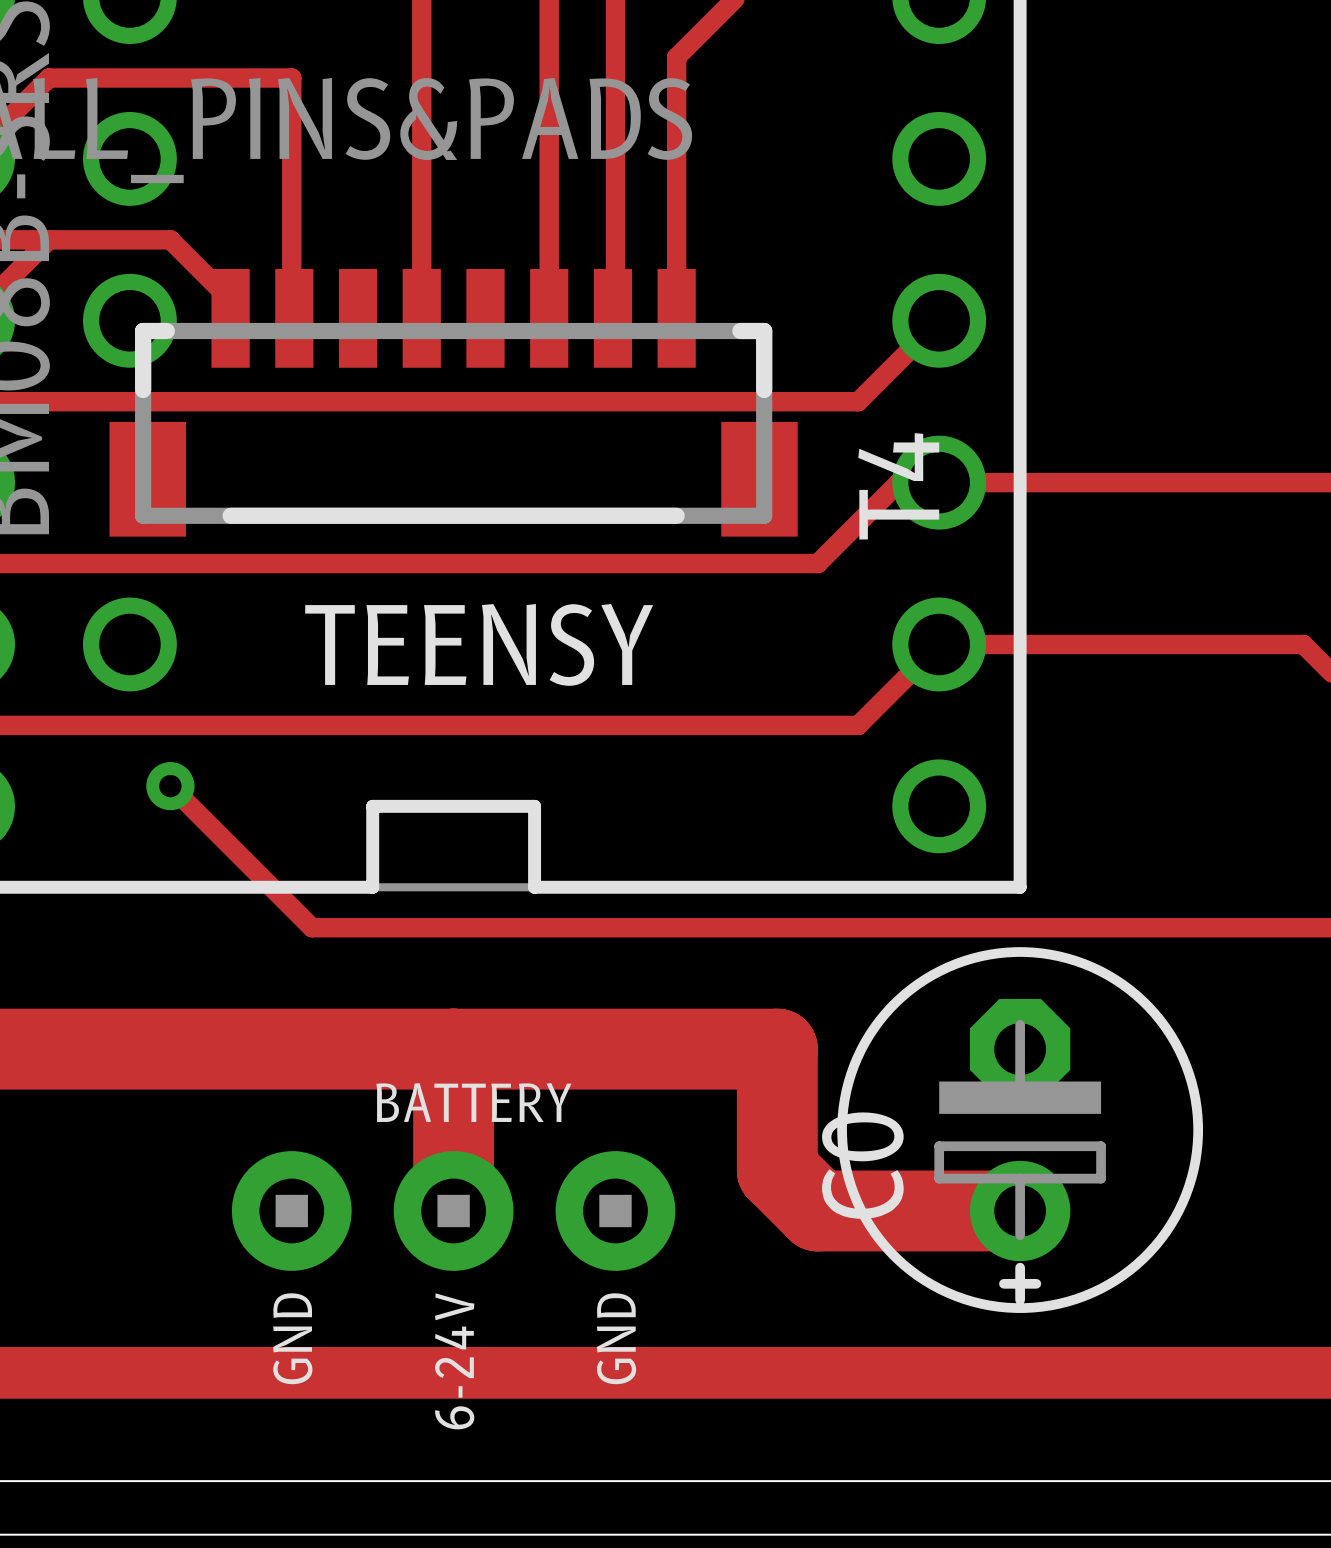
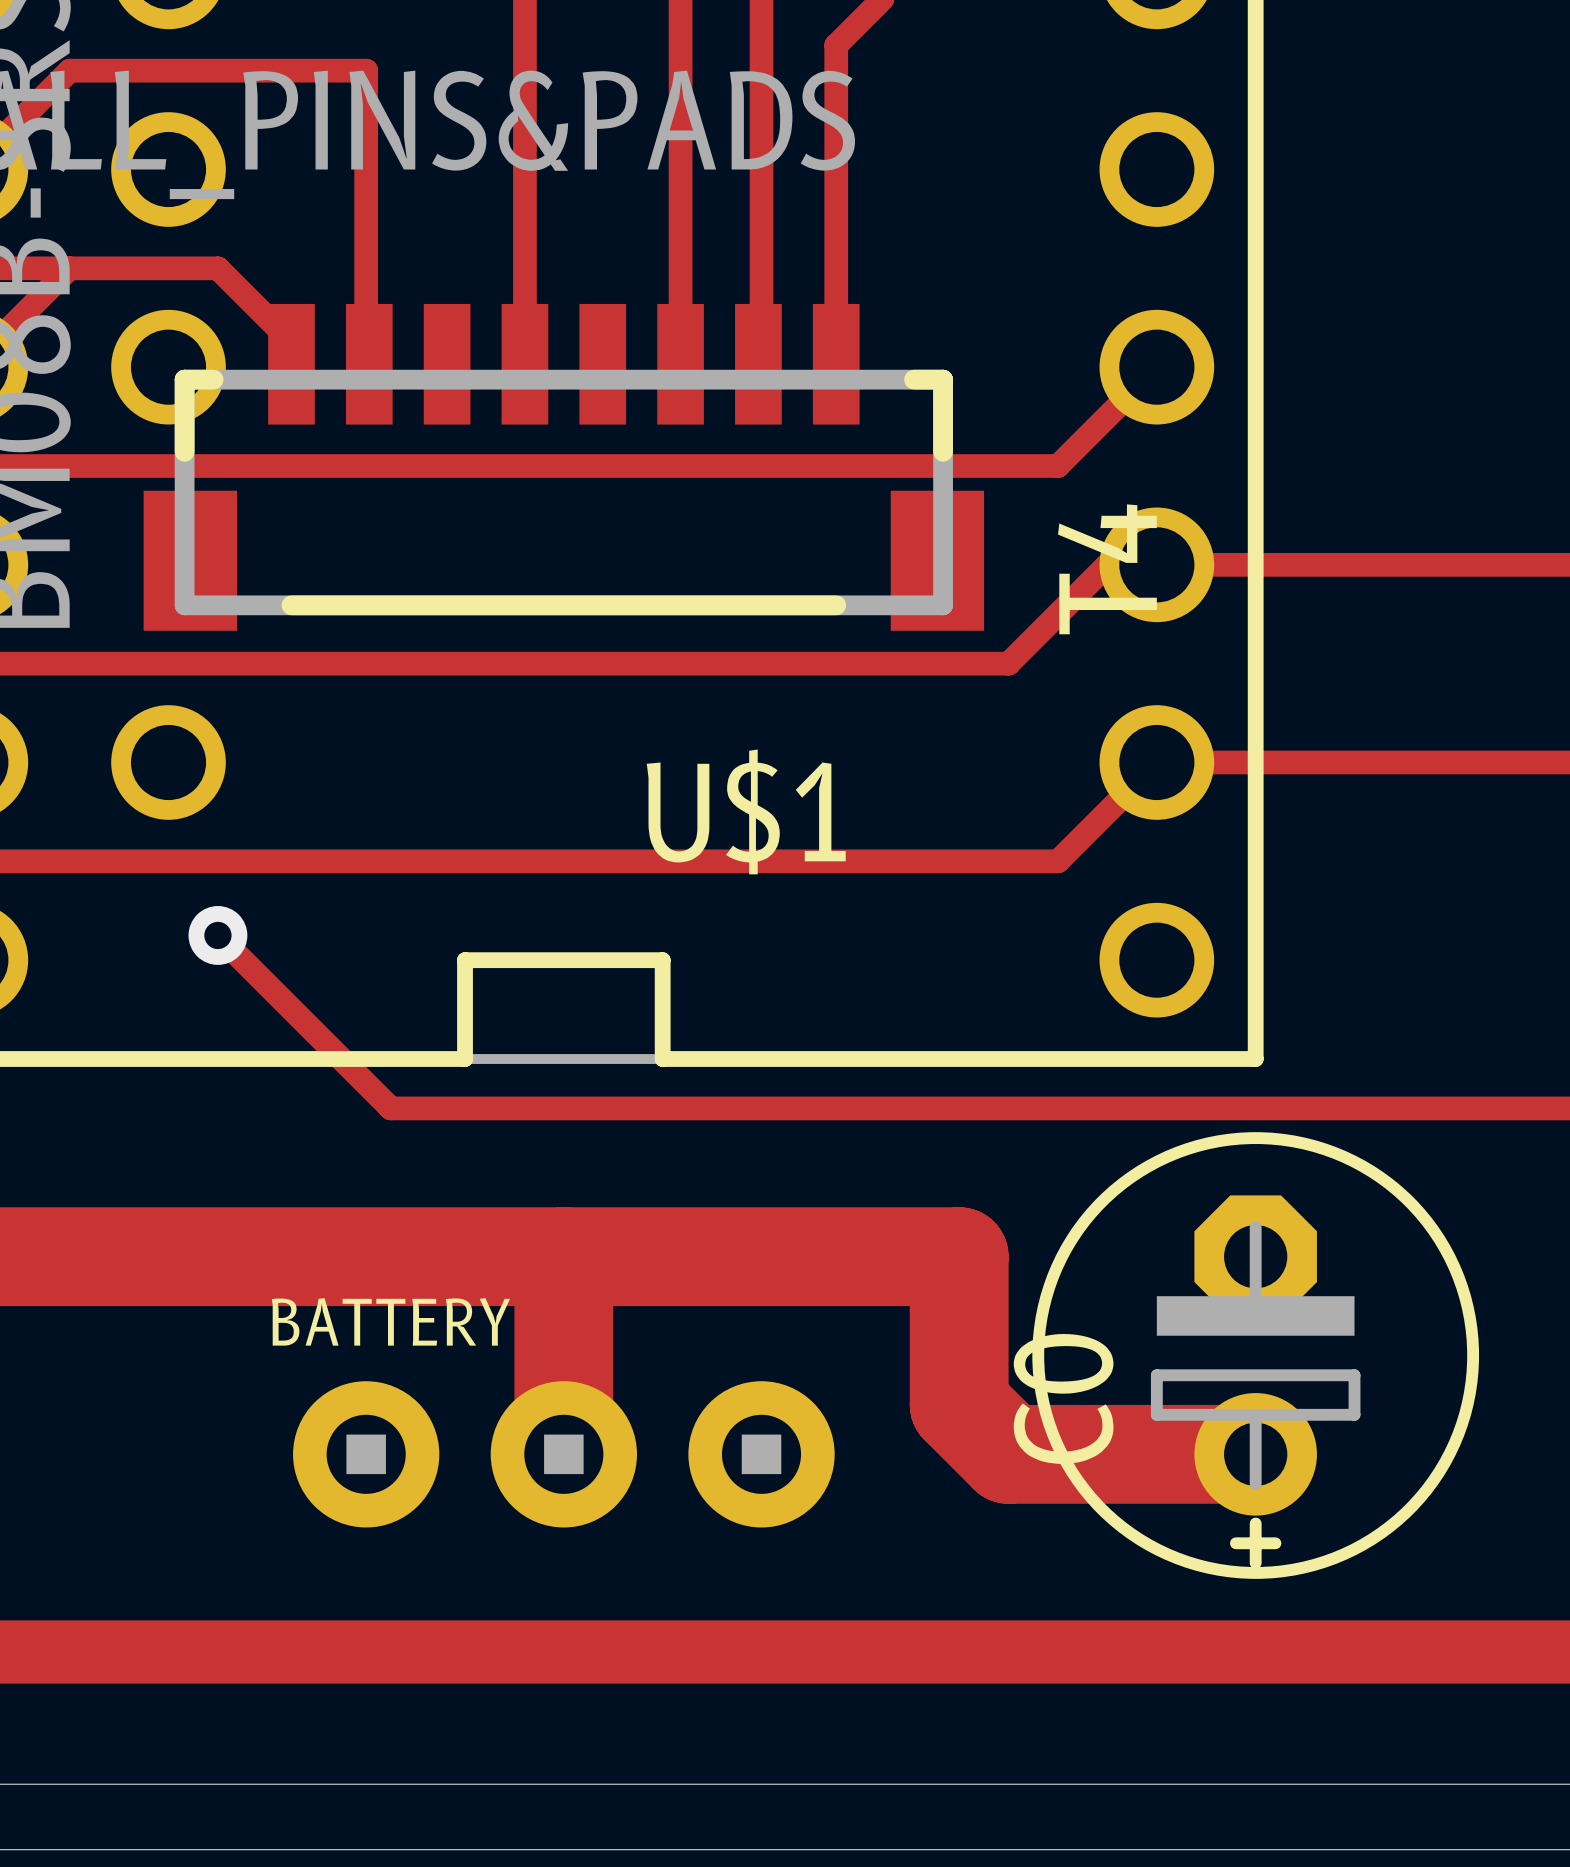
TEENSY name: TEENSY (479, 644) -> U$1 (746, 811)
BATTERY name position: BATTERY (473, 1102) -> BATTERY (390, 1321)
text: GND (292, 1338) -> none
text: GND (616, 1338) -> none
text: 6-24V (454, 1361) -> none

